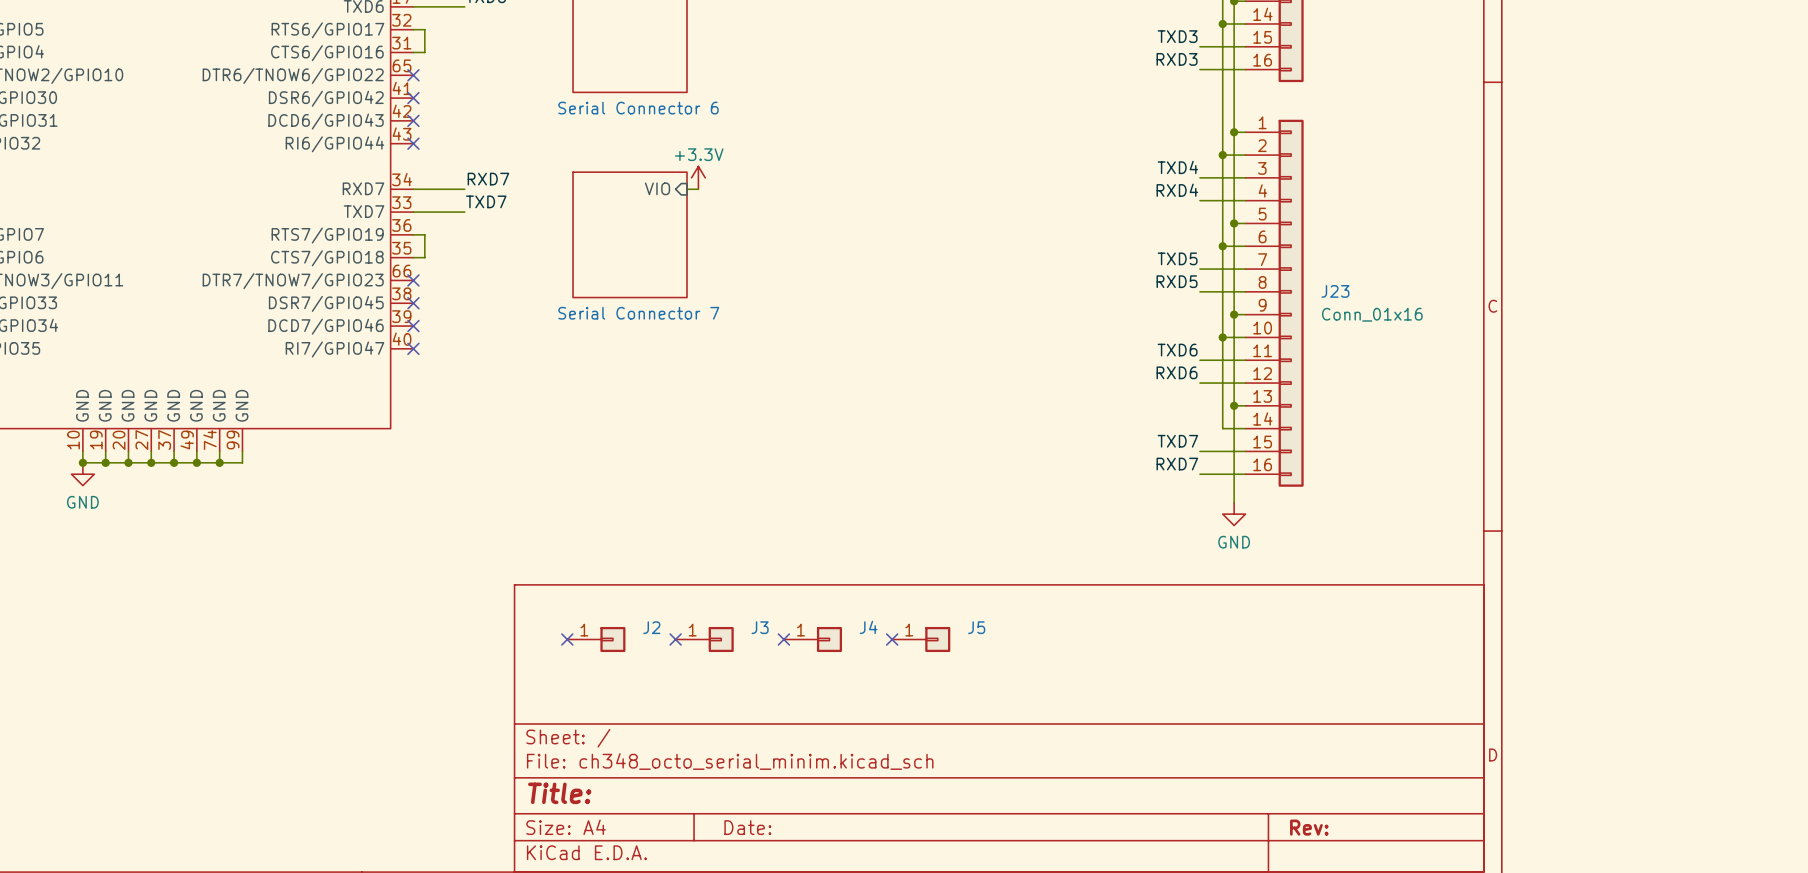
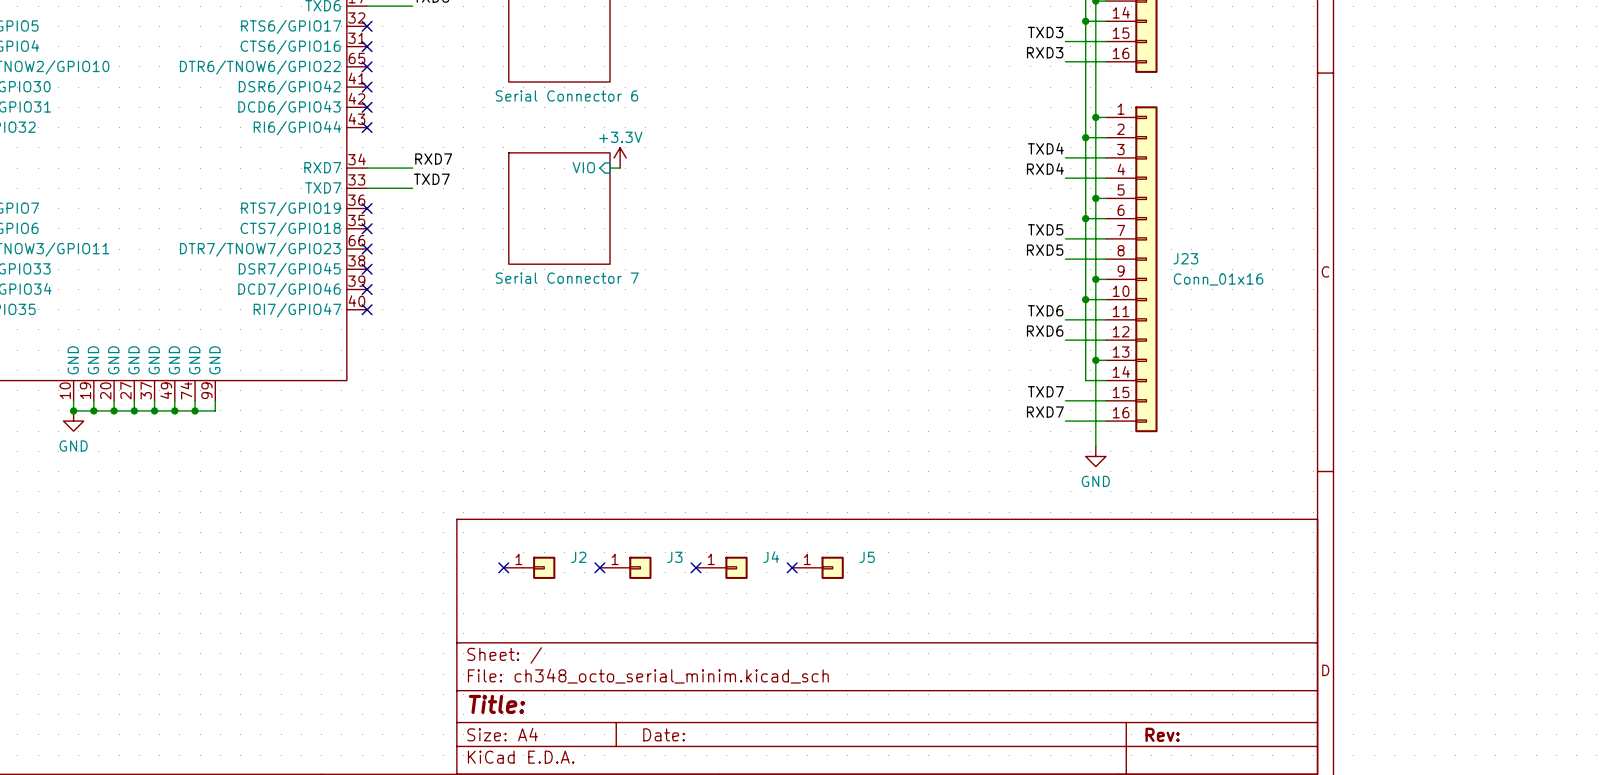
wire: (413, 29) (424, 29) (424, 52) (413, 52) -> none
no-connect mark: none -> (367, 26)
no-connect mark: none -> (367, 46)
wire: (413, 234) (424, 234) (424, 257) (413, 257) -> none
no-connect mark: none -> (367, 208)
no-connect mark: none -> (367, 228)

